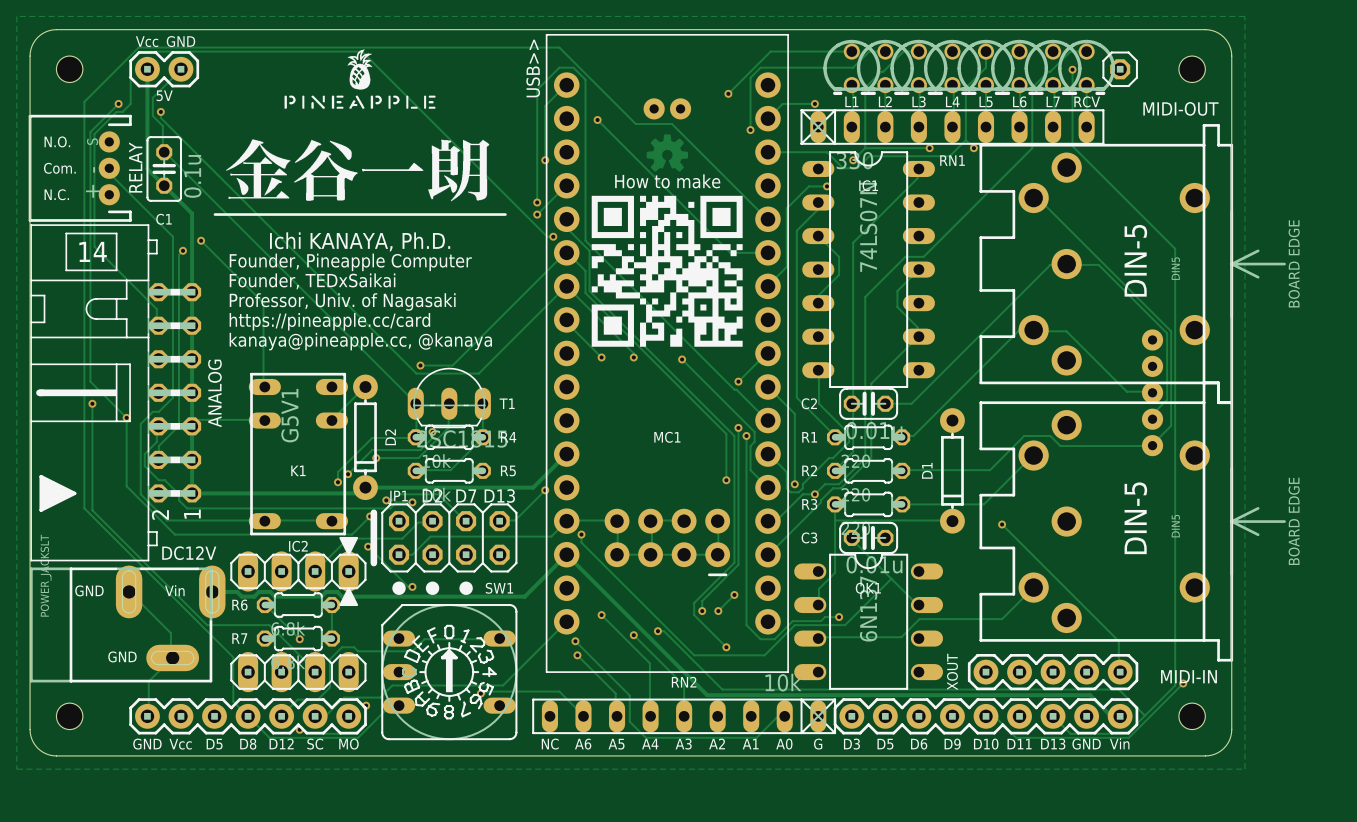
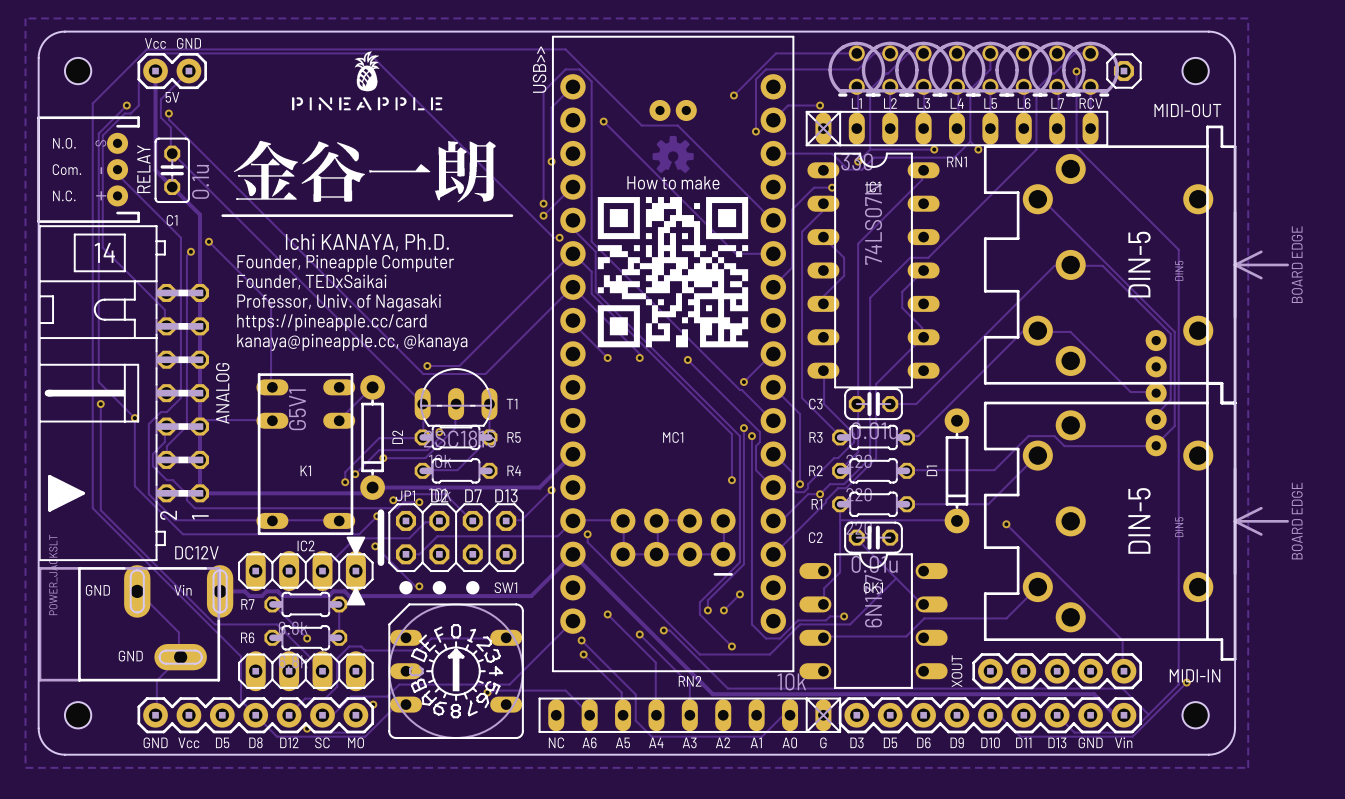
C2 name: C2 (809, 403) -> C3 (815, 404)
R4 name: R4 (508, 437) -> R5 (514, 437)
R1 name: R1 (809, 437) -> R3 (815, 437)
R5 name: R5 (508, 470) -> R4 (514, 470)
R3 name: R3 (809, 504) -> R1 (816, 504)
C3 name: C3 (809, 537) -> C2 (815, 537)
R6 name: R6 (239, 605) -> R7 (247, 604)
R7 name: R7 (239, 638) -> R6 (247, 637)

